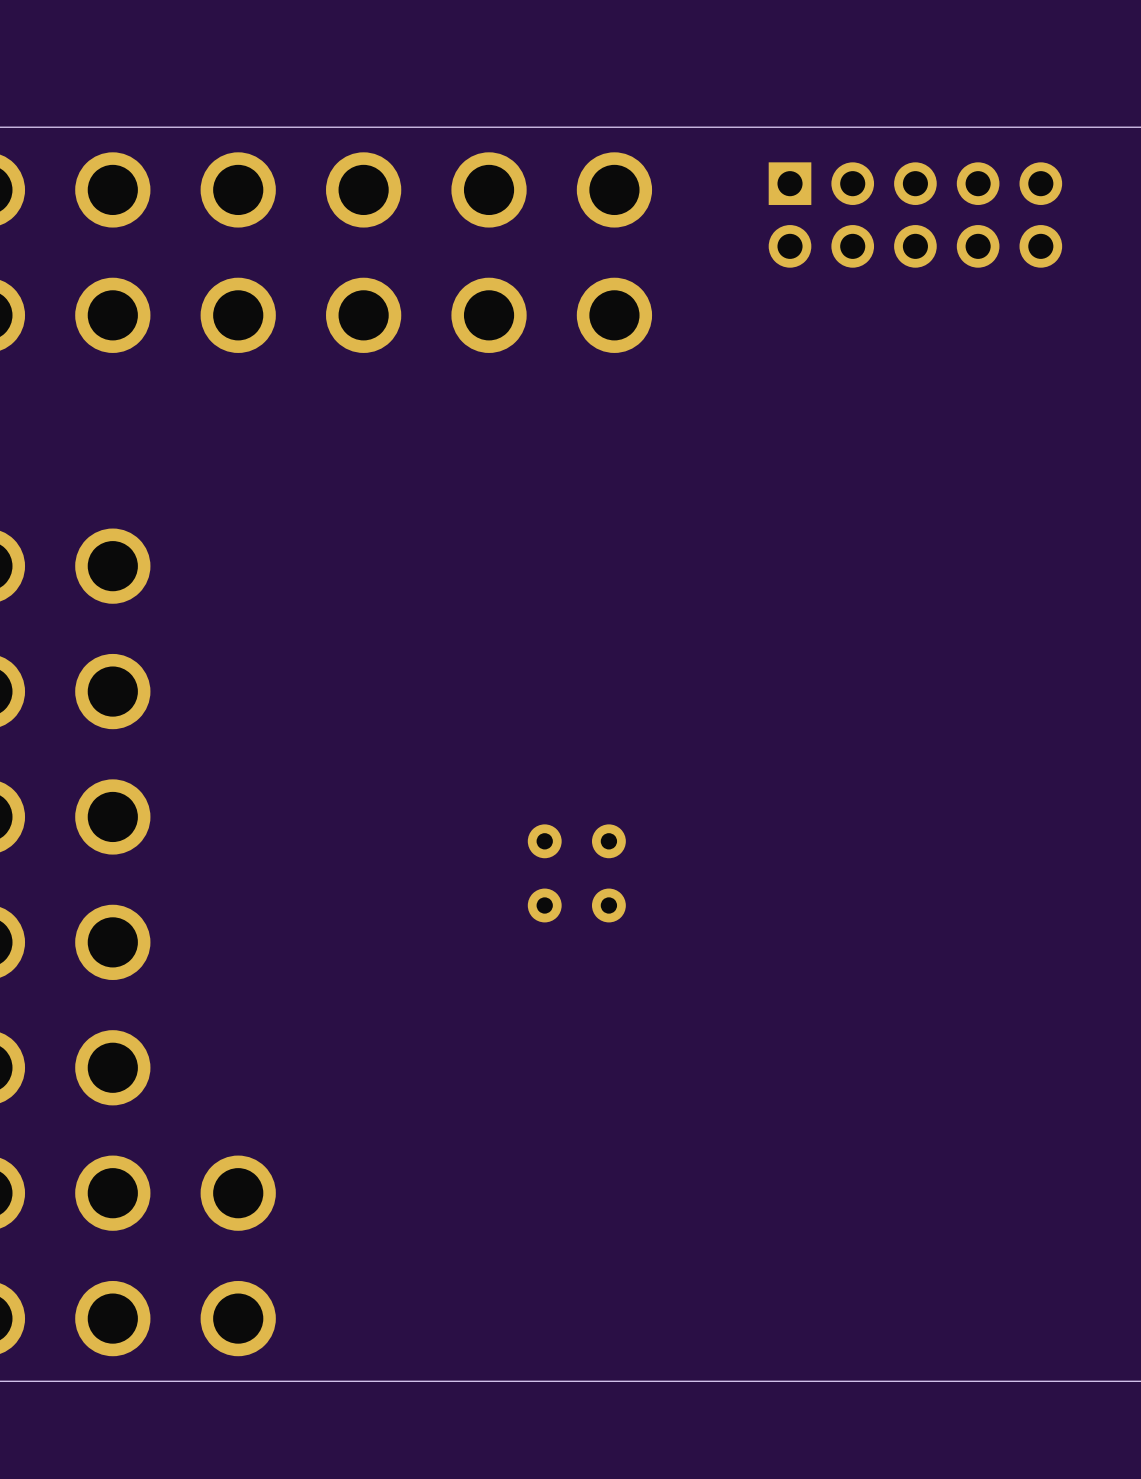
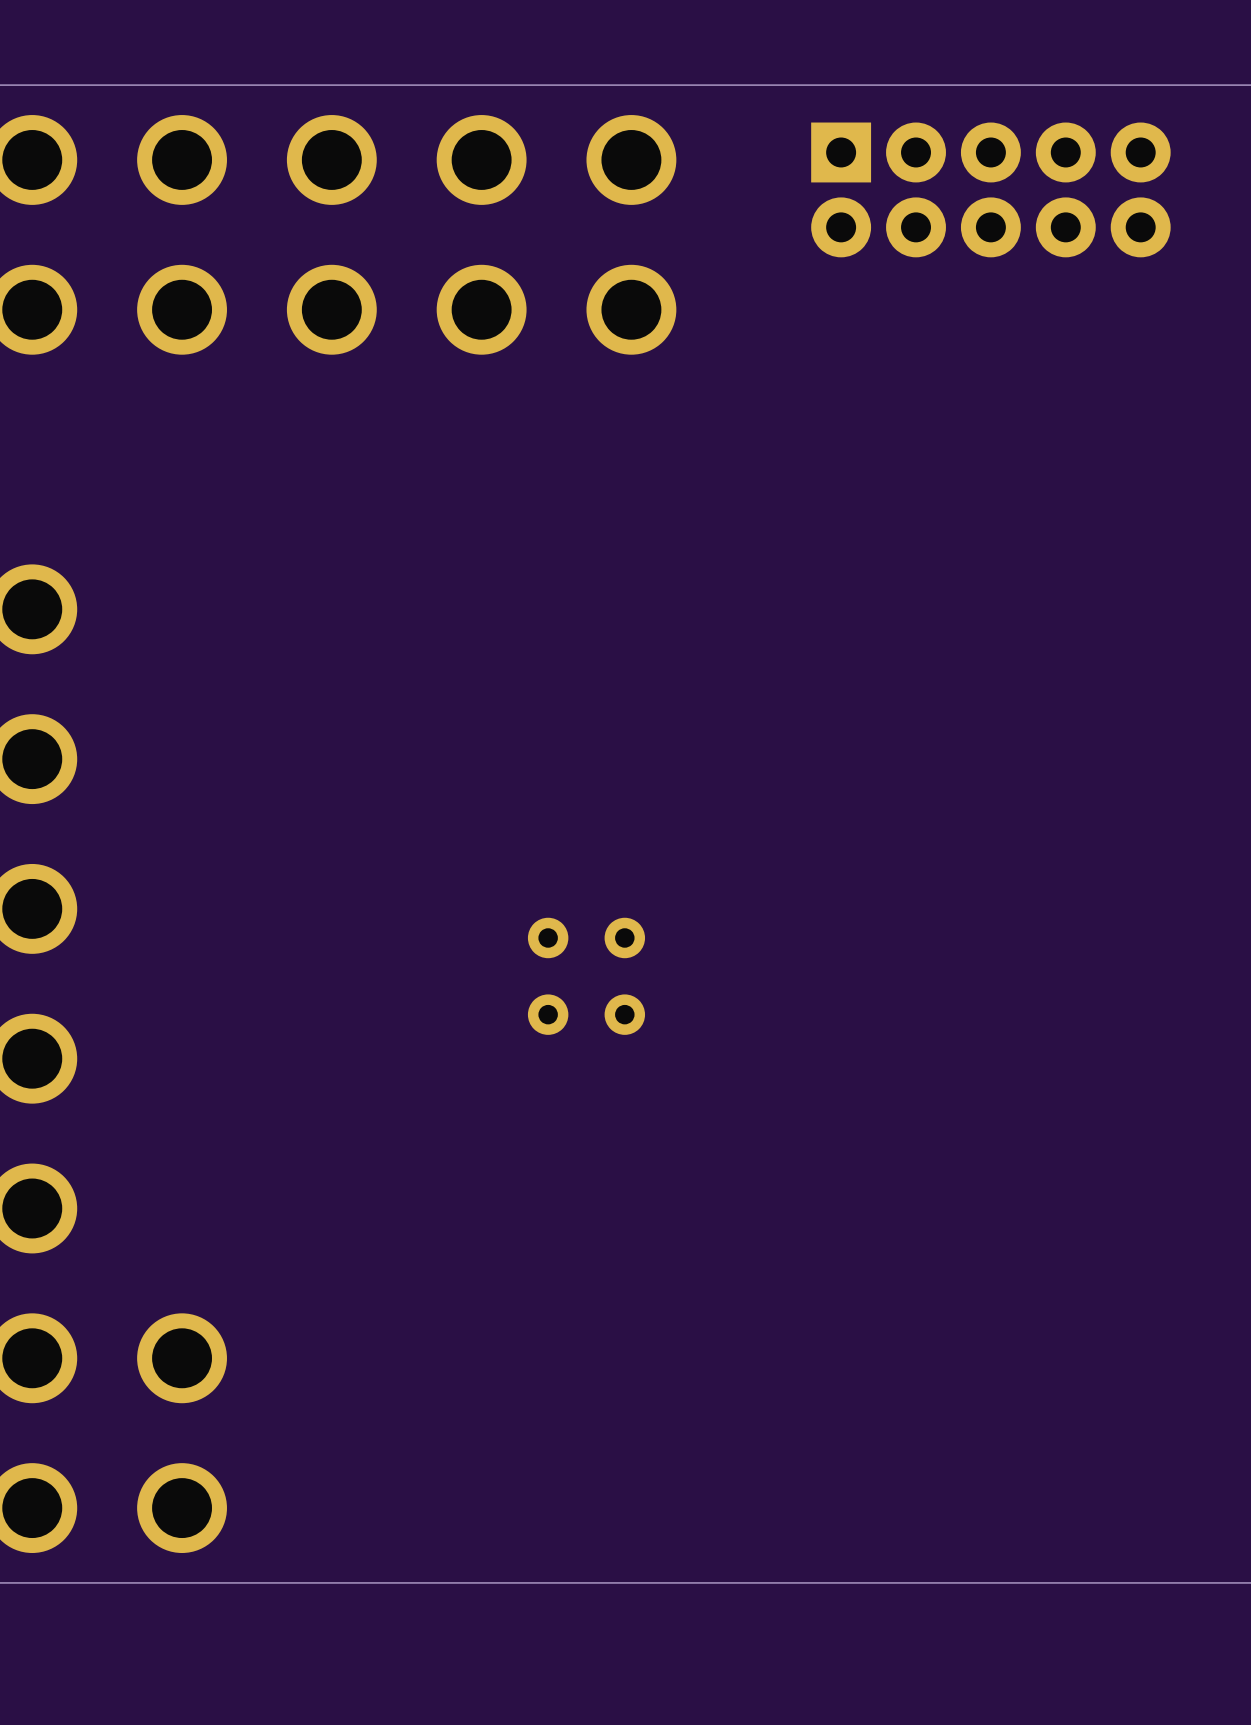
part footprint: [768, 162, 1063, 268] -> [811, 122, 1171, 258]

